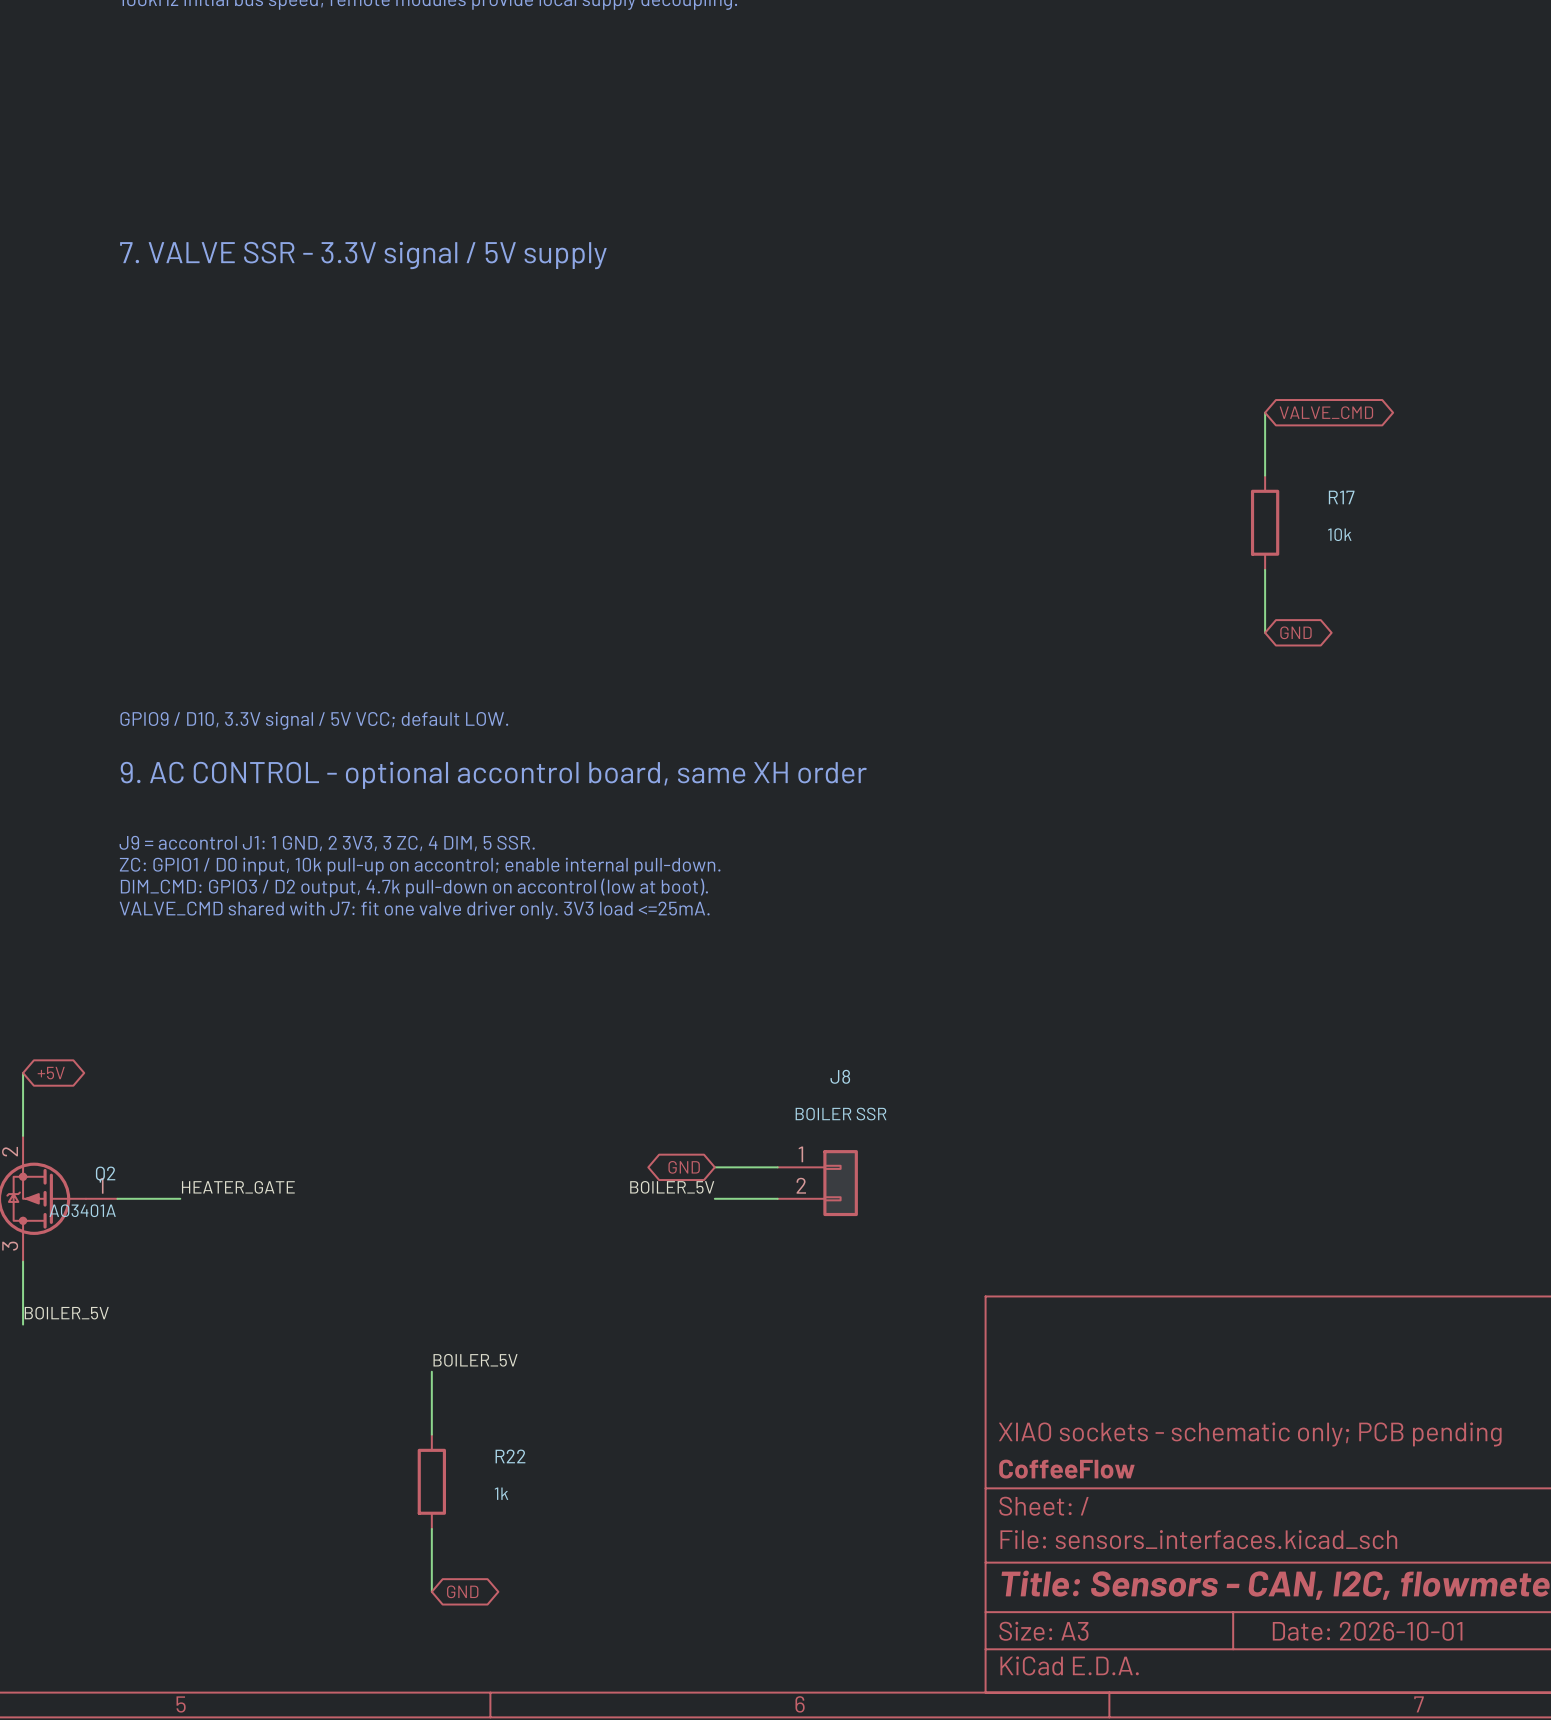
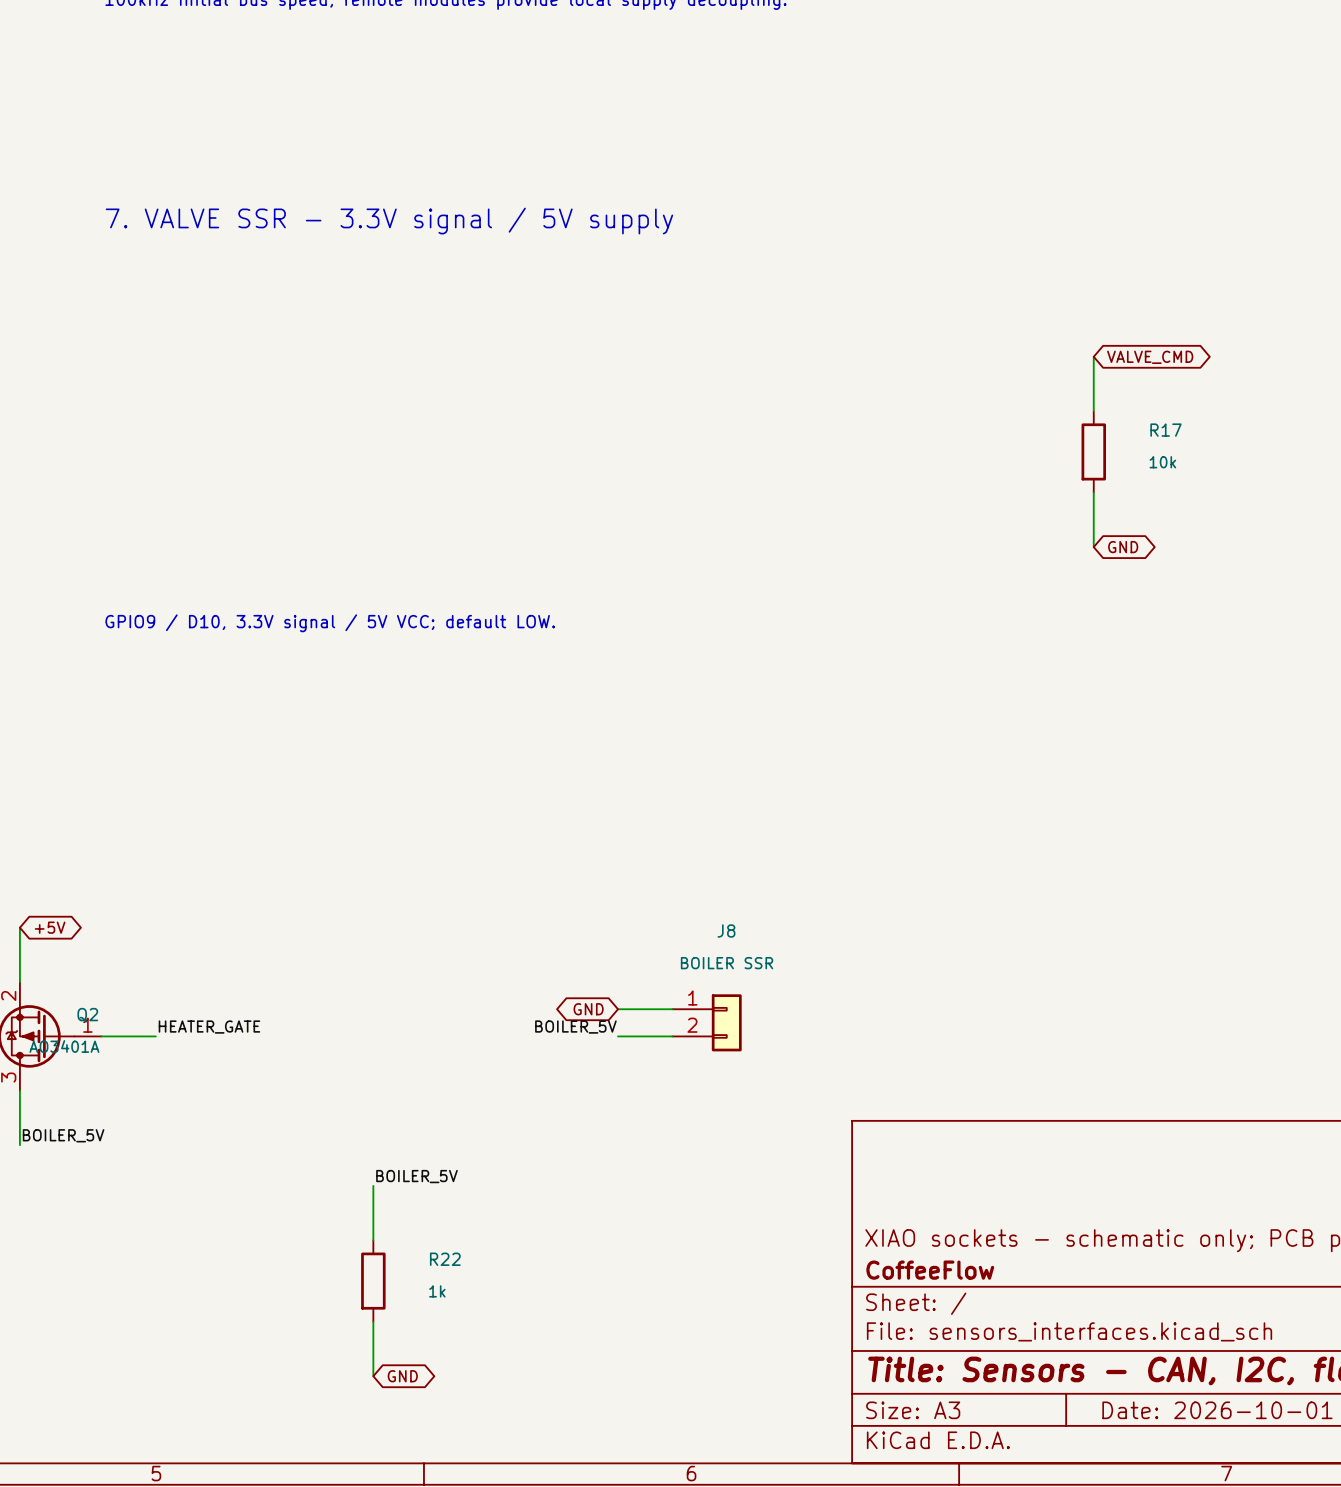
text: 9. AC CONTROL - optional accontrol board, same XH order (493, 775) -> none
text: J9 = accontrol J1: 1 GND, 2 3V3, 3 ZC, 4 DIM, 5 SSR. (327, 843) -> none
text: ZC: GPIO1 / D0 input, 10k pull-up on accontrol; enable internal pull-down. (420, 866) -> none
text: DIM_CMD: GPIO3 / D2 output, 4.7k pull-down on accontrol (low at boot). (414, 887) -> none
text: VALVE_CMD shared with J7: fit one valve driver only. 3V3 load <=25mA. (414, 910) -> none

